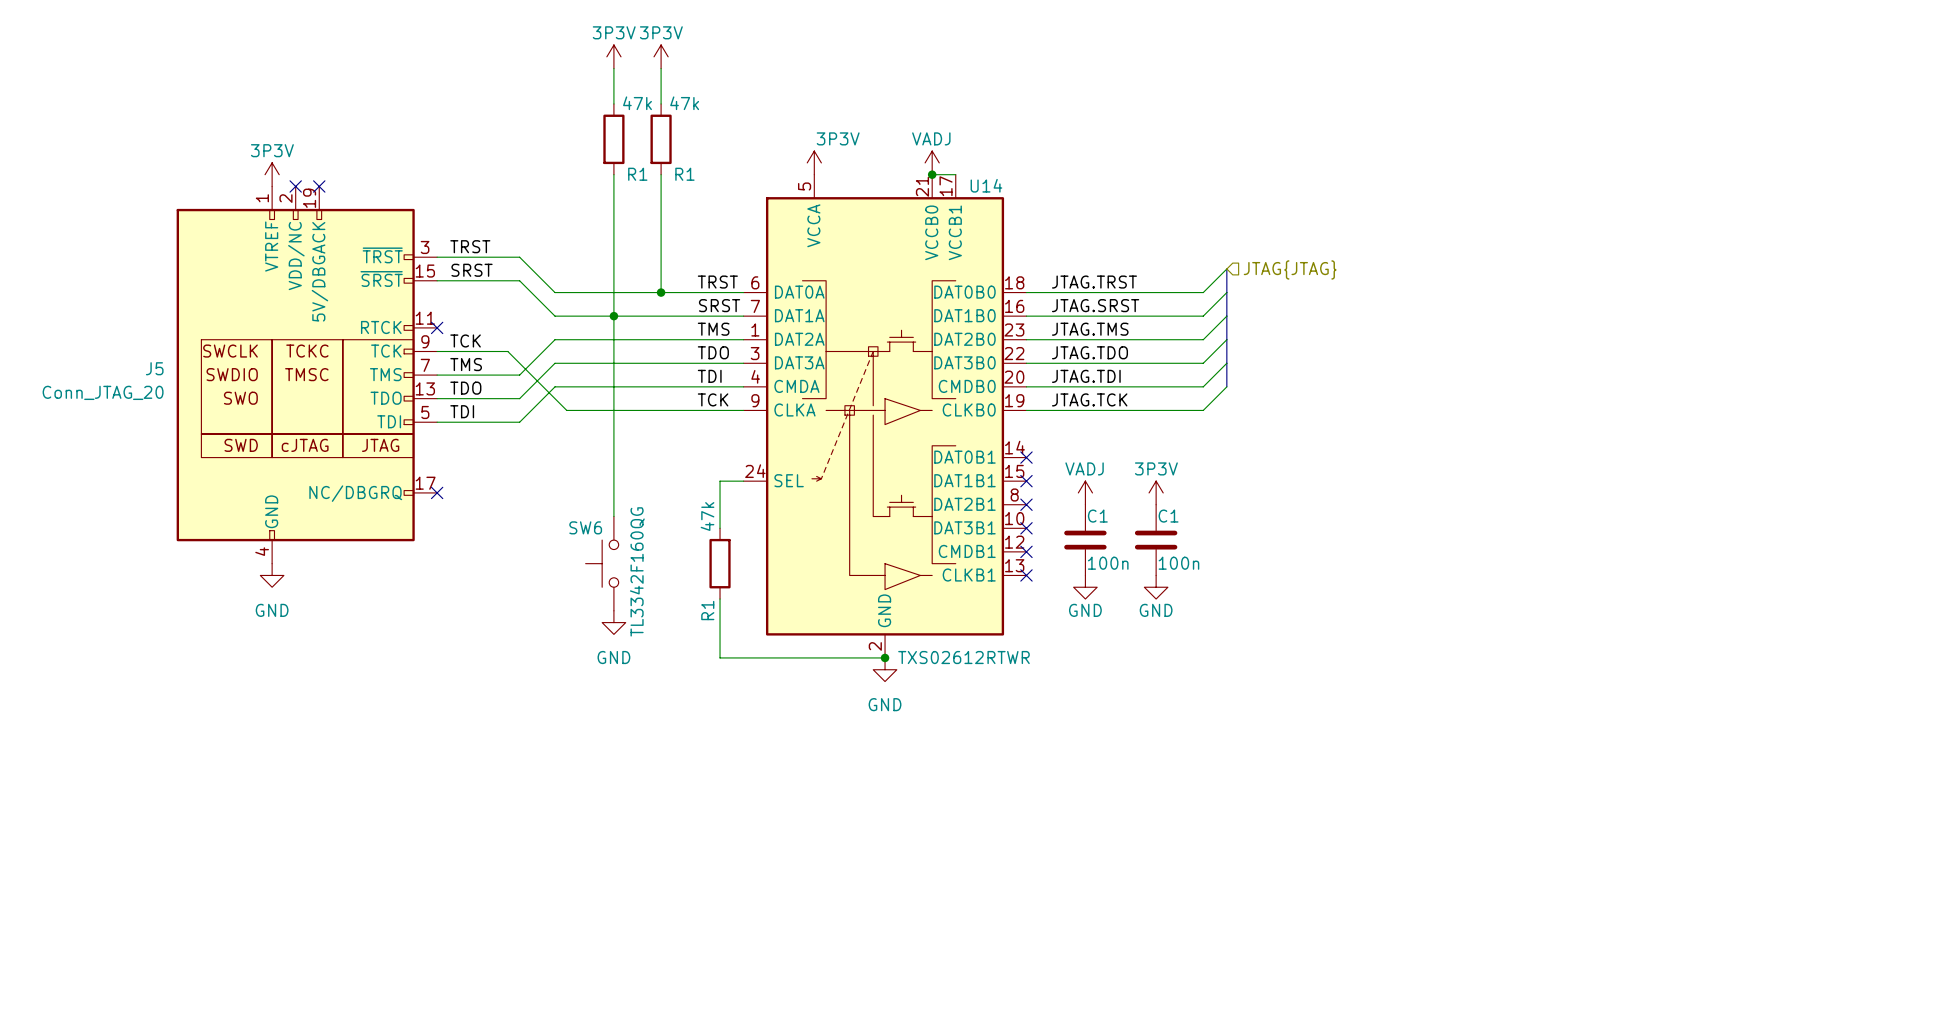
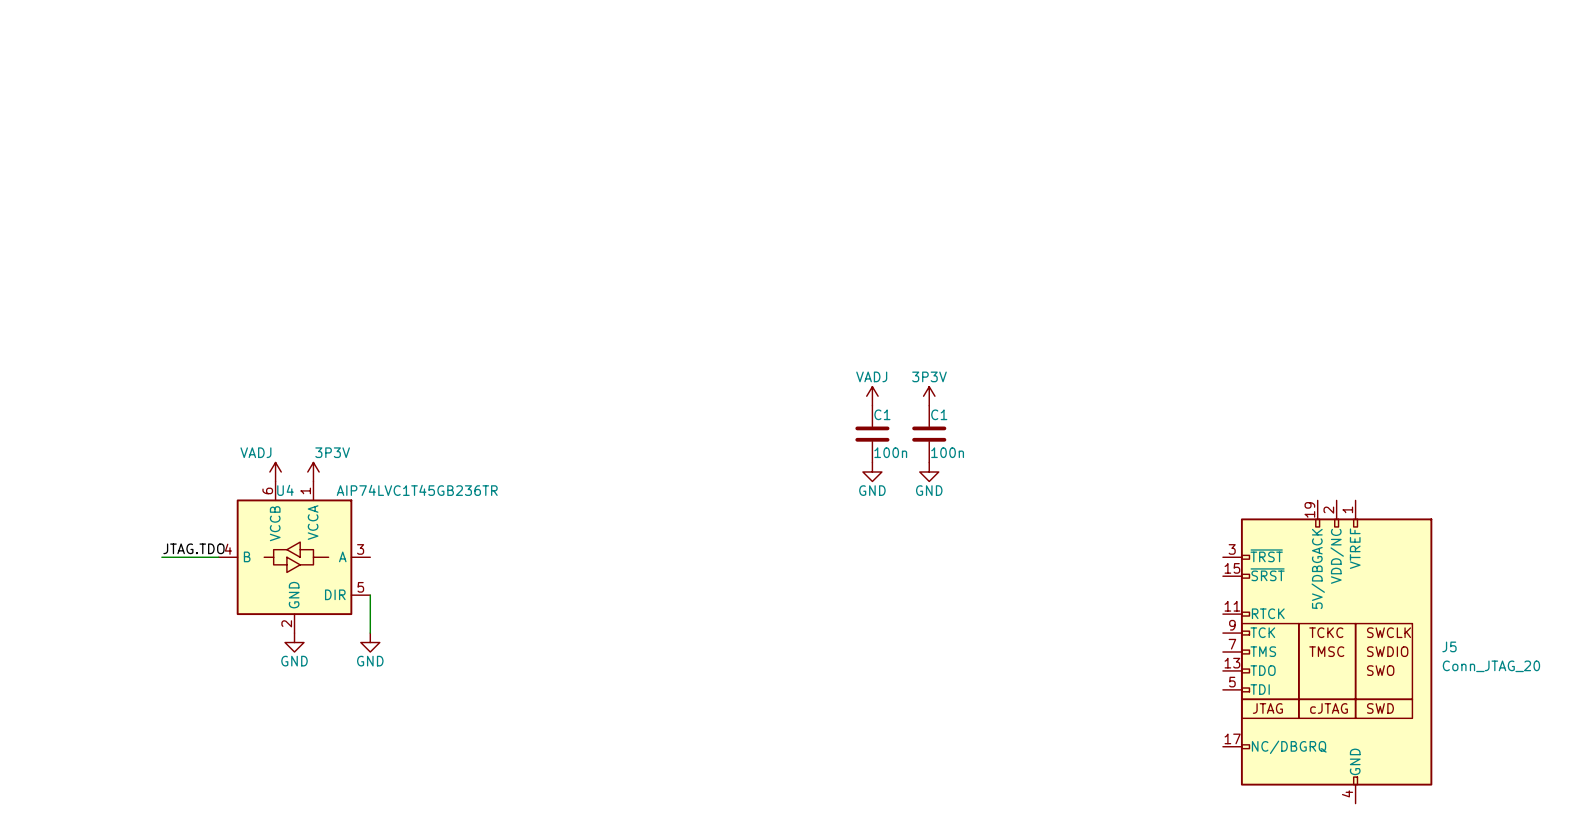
power symbol: 3P3V (613, 56) -> none
power symbol: 3P3V (661, 56) -> none
wire: (613, 68) (613, 103) -> none
wire: (661, 68) (661, 103) -> none
R1: 47k (613, 139) -> none
R1: 47k (661, 139) -> none
power symbol: 3P3V (814, 162) -> none
power symbol: VADJ (932, 162) -> none
power symbol: 3P3V (272, 174) -> none
wire: (613, 174) (613, 516) -> none
wire: (661, 174) (661, 292) -> none
wire: (932, 174) (955, 174) -> none
junction: (932, 174) -> none
no-connect mark: (295, 186) -> none
no-connect mark: (319, 186) -> none
label: TRST (470, 246) -> none
wire: (437, 257) (519, 257) (555, 292) (743, 292) -> none
wire: (1226, 268) (1203, 292) (1026, 292) -> none
bus: (1226, 268) (1226, 386) -> none
hierarchical label: JTAG{JTAG} (1290, 269) -> none
label: SRST (472, 270) -> none
wire: (437, 280) (519, 280) (555, 316) (743, 316) -> none
label: TRST (717, 282) -> none
label: JTAG.TRST (1094, 282) -> none
junction: (661, 292) -> none
wire: (1226, 292) (1203, 316) (1026, 316) -> none
label: SRST (719, 305) -> none
label: JTAG.SRST (1095, 305) -> none
junction: (613, 316) -> none
wire: (1226, 316) (1203, 339) (1026, 339) -> none
no-connect mark: (437, 327) -> none
label: TMS (713, 329) -> none
label: JTAG.TMS (1090, 329) -> none
wire: (743, 339) (555, 339) (519, 375) (437, 375) -> none
wire: (1226, 339) (1203, 363) (1026, 363) -> none
label: TCK (465, 340) -> none
wire: (437, 351) (507, 351) (566, 410) (743, 410) -> none
label: TDO (713, 352) -> none
label: JTAG.TDO (1089, 352) -> none
wire: (743, 363) (555, 363) (519, 398) (437, 398) -> none
wire: (1226, 363) (1203, 386) (1026, 386) -> none
label: TMS (466, 364) -> none
J5 flip: as is (295, 375) -> left-right (1336, 652)
J5 position: (306, 375) -> (1327, 652)
label: TDI (709, 376) -> none
label: JTAG.TDI (1086, 376) -> none
wire: (743, 386) (555, 386) (519, 422) (437, 422) -> none
wire: (1226, 386) (1203, 410) (1026, 410) -> none
label: TDO (465, 388) -> none
label: TCK (713, 399) -> none
label: JTAG.TCK (1089, 399) -> none
label: TDI (462, 411) -> none
U14: TXS02612RTWR (885, 416) -> none
no-connect mark: (1026, 457) -> none
wire: (743, 481) (720, 481) (720, 528) -> none
no-connect mark: (1026, 481) -> none
no-connect mark: (437, 492) -> none
no-connect mark: (1026, 504) -> none
no-connect mark: (1026, 528) -> none
no-connect mark: (1026, 551) -> none
SW6: TL3342F160QG (602, 563) -> none
R1: 47k (720, 563) -> none
power symbol: GND (272, 575) -> none
no-connect mark: (1026, 575) -> none
power symbol: none -> VADJ (275, 472)
power symbol: none -> 3P3V (313, 472)
wire: (720, 599) (720, 657) (885, 657) -> none
power symbol: GND (613, 622) -> none
junction: (885, 657) -> none
power symbol: GND (885, 669) -> none
label: none -> JTAG.TDO (193, 548)
wire: none -> (161, 557) (218, 557)
U4: none -> AIP74LVC1T45GB236TR (294, 557)
wire: none -> (370, 595) (370, 633)
power symbol: none -> GND (294, 642)
power symbol: none -> GND (370, 642)

